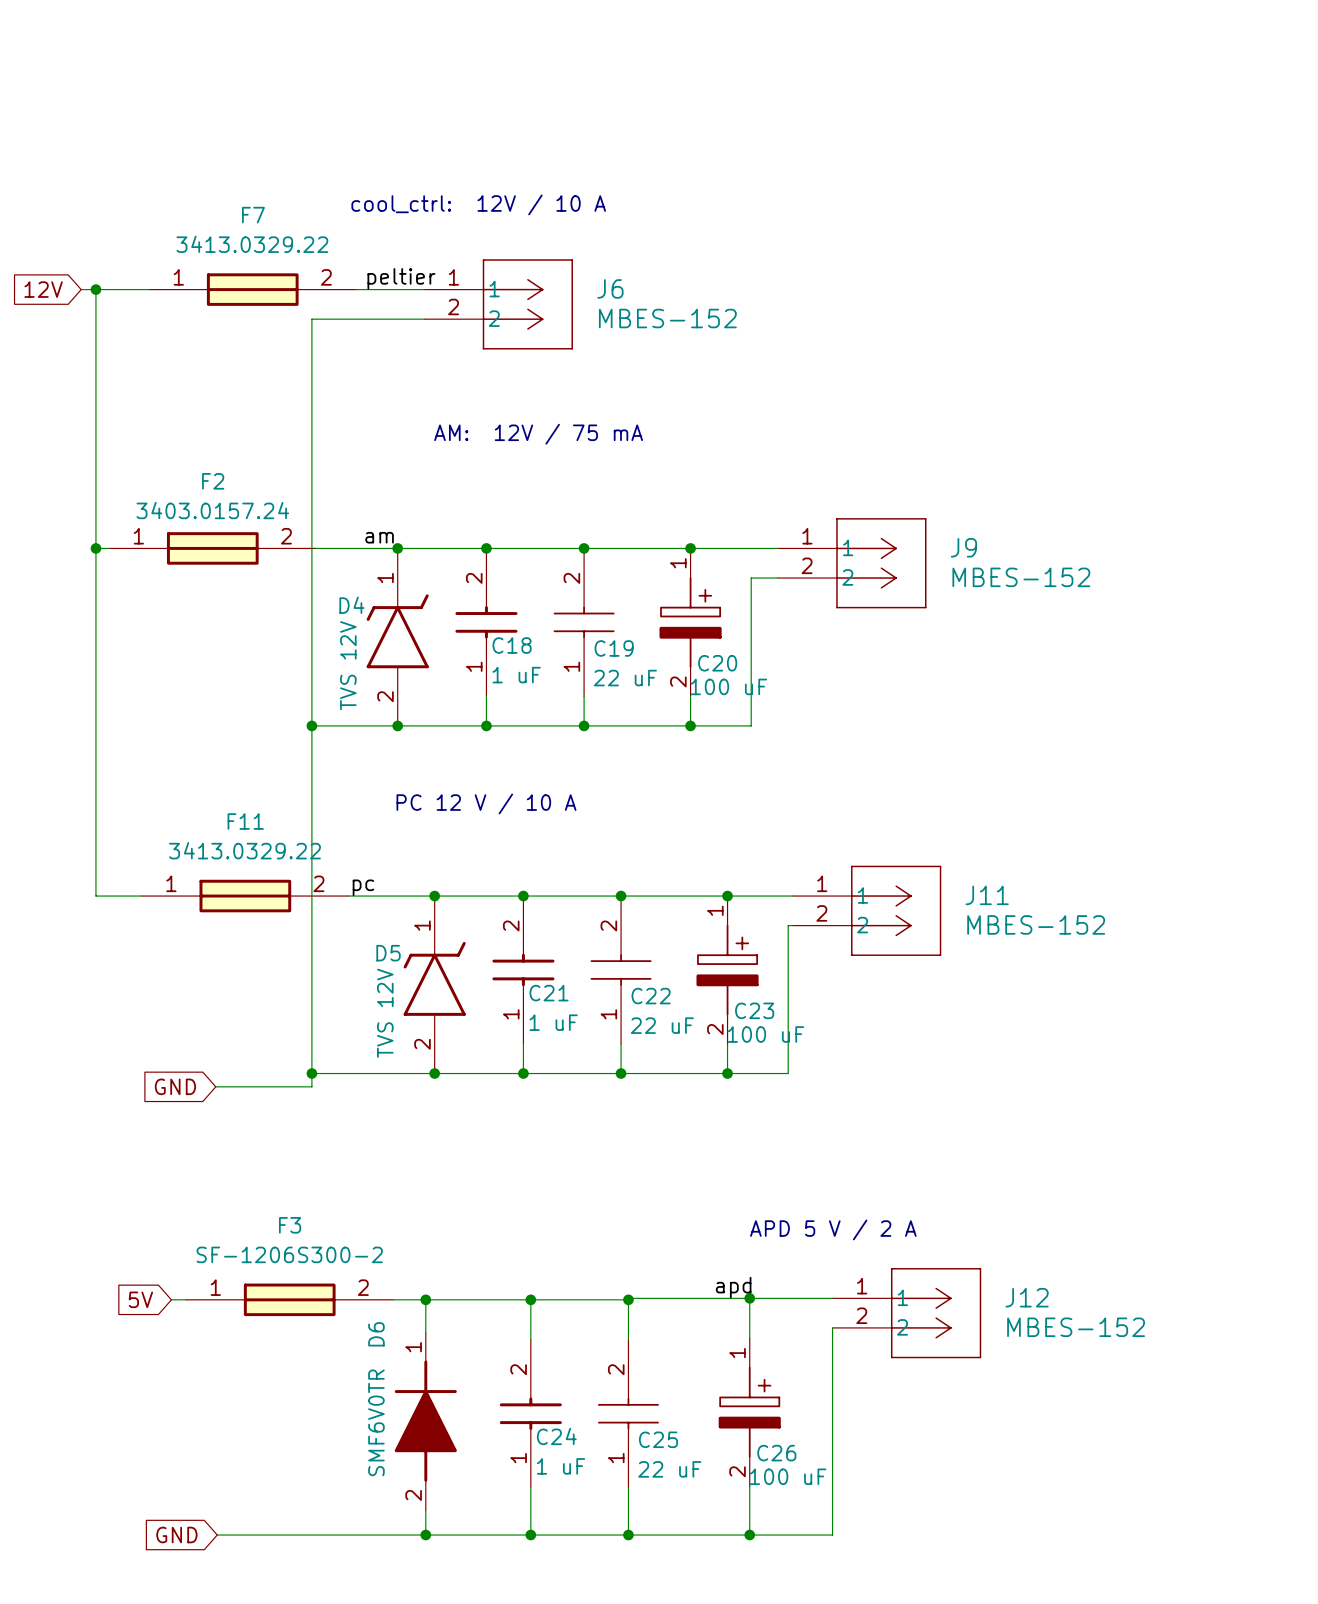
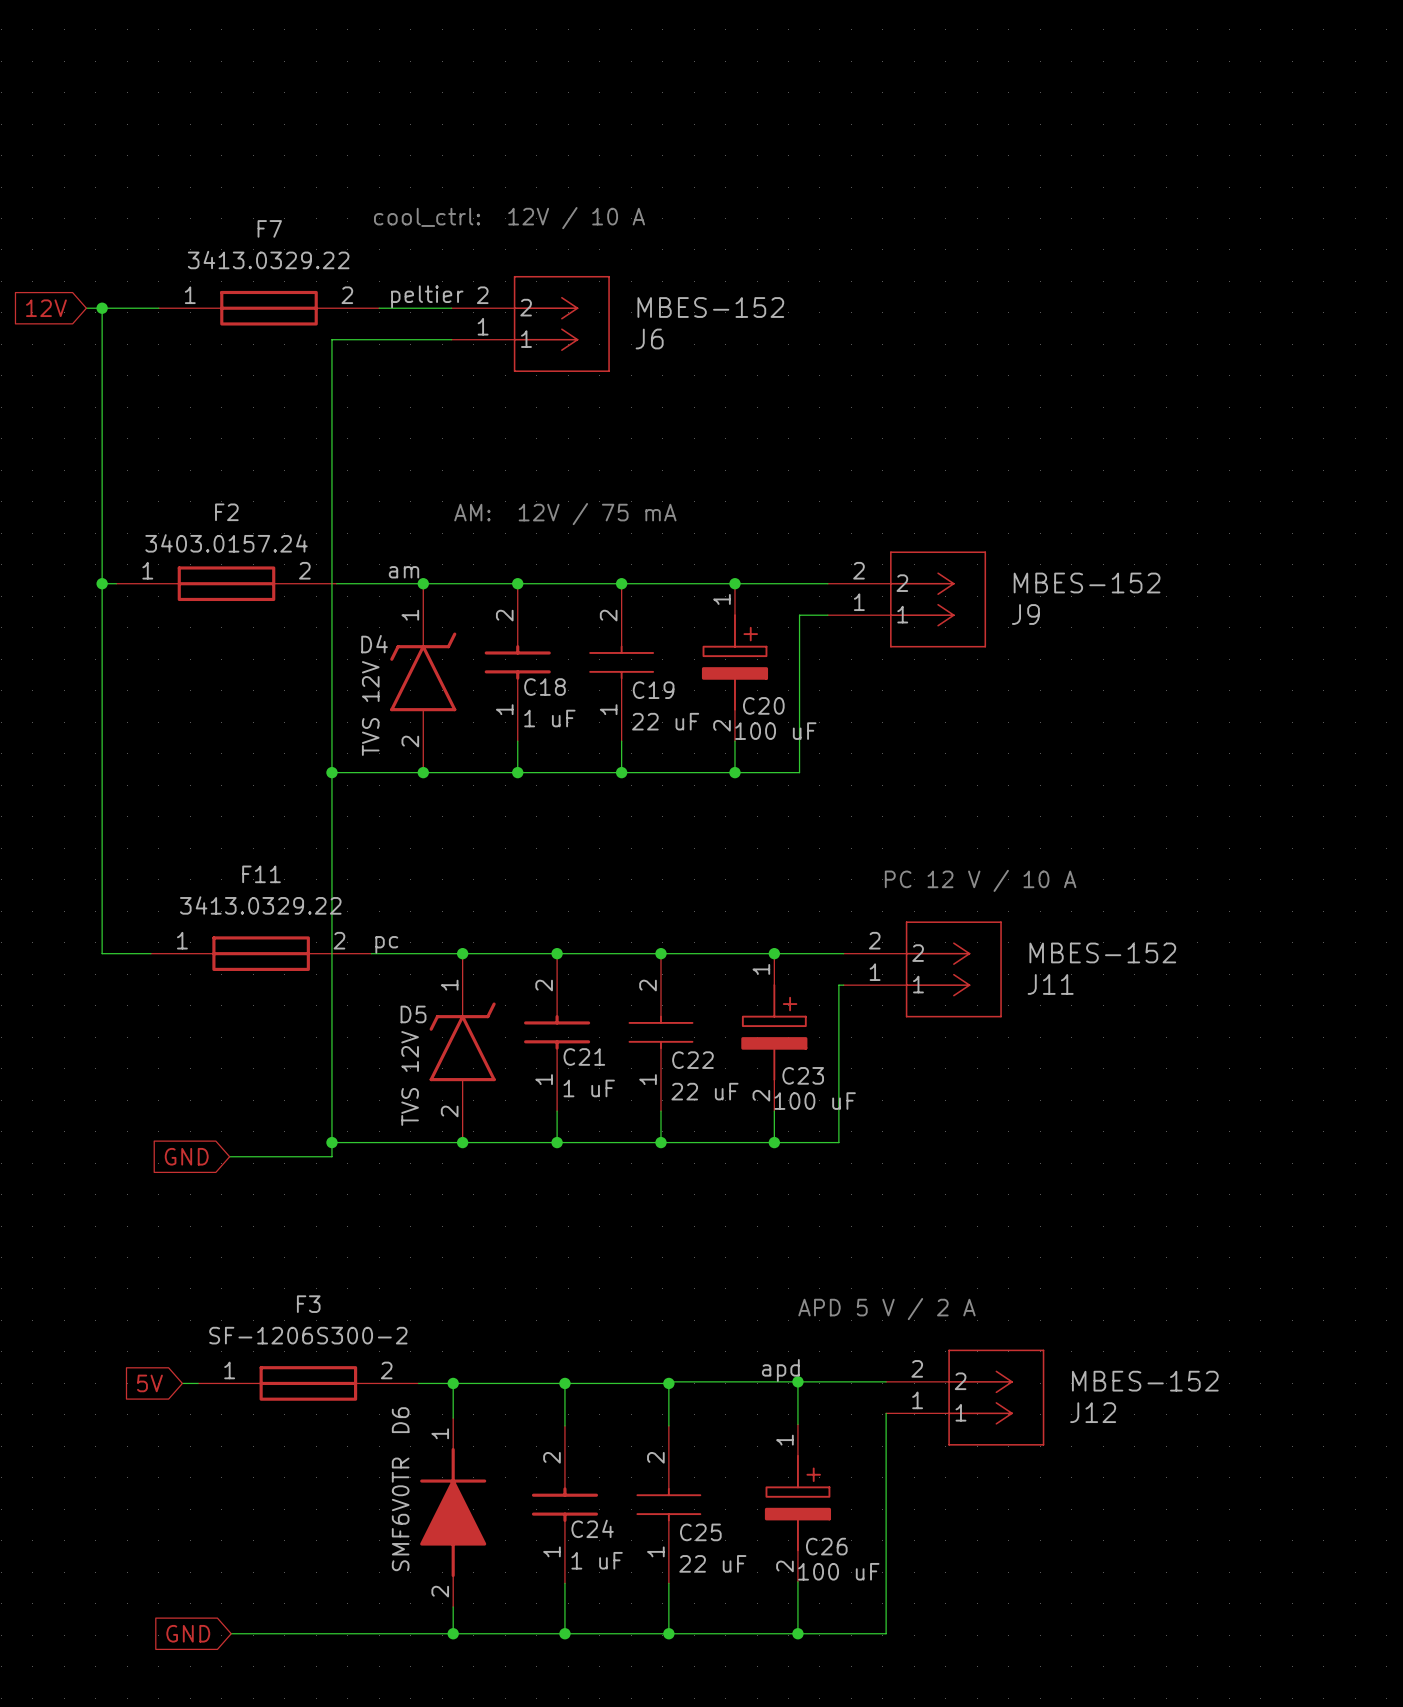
J6 flip: as is (527, 304) -> up-down (561, 323)
text position: AM: 12V / 75 mA (538, 434) -> AM: 12V / 75 mA (565, 514)
J9 flip: as is (881, 563) -> up-down (938, 599)
text: PC 12 V / 10 A (486, 803) -> none
text: none -> PC 12 V / 10 A (980, 880)
J11 flip: as is (896, 910) -> up-down (953, 969)
J12 flip: as is (936, 1313) -> up-down (996, 1397)

